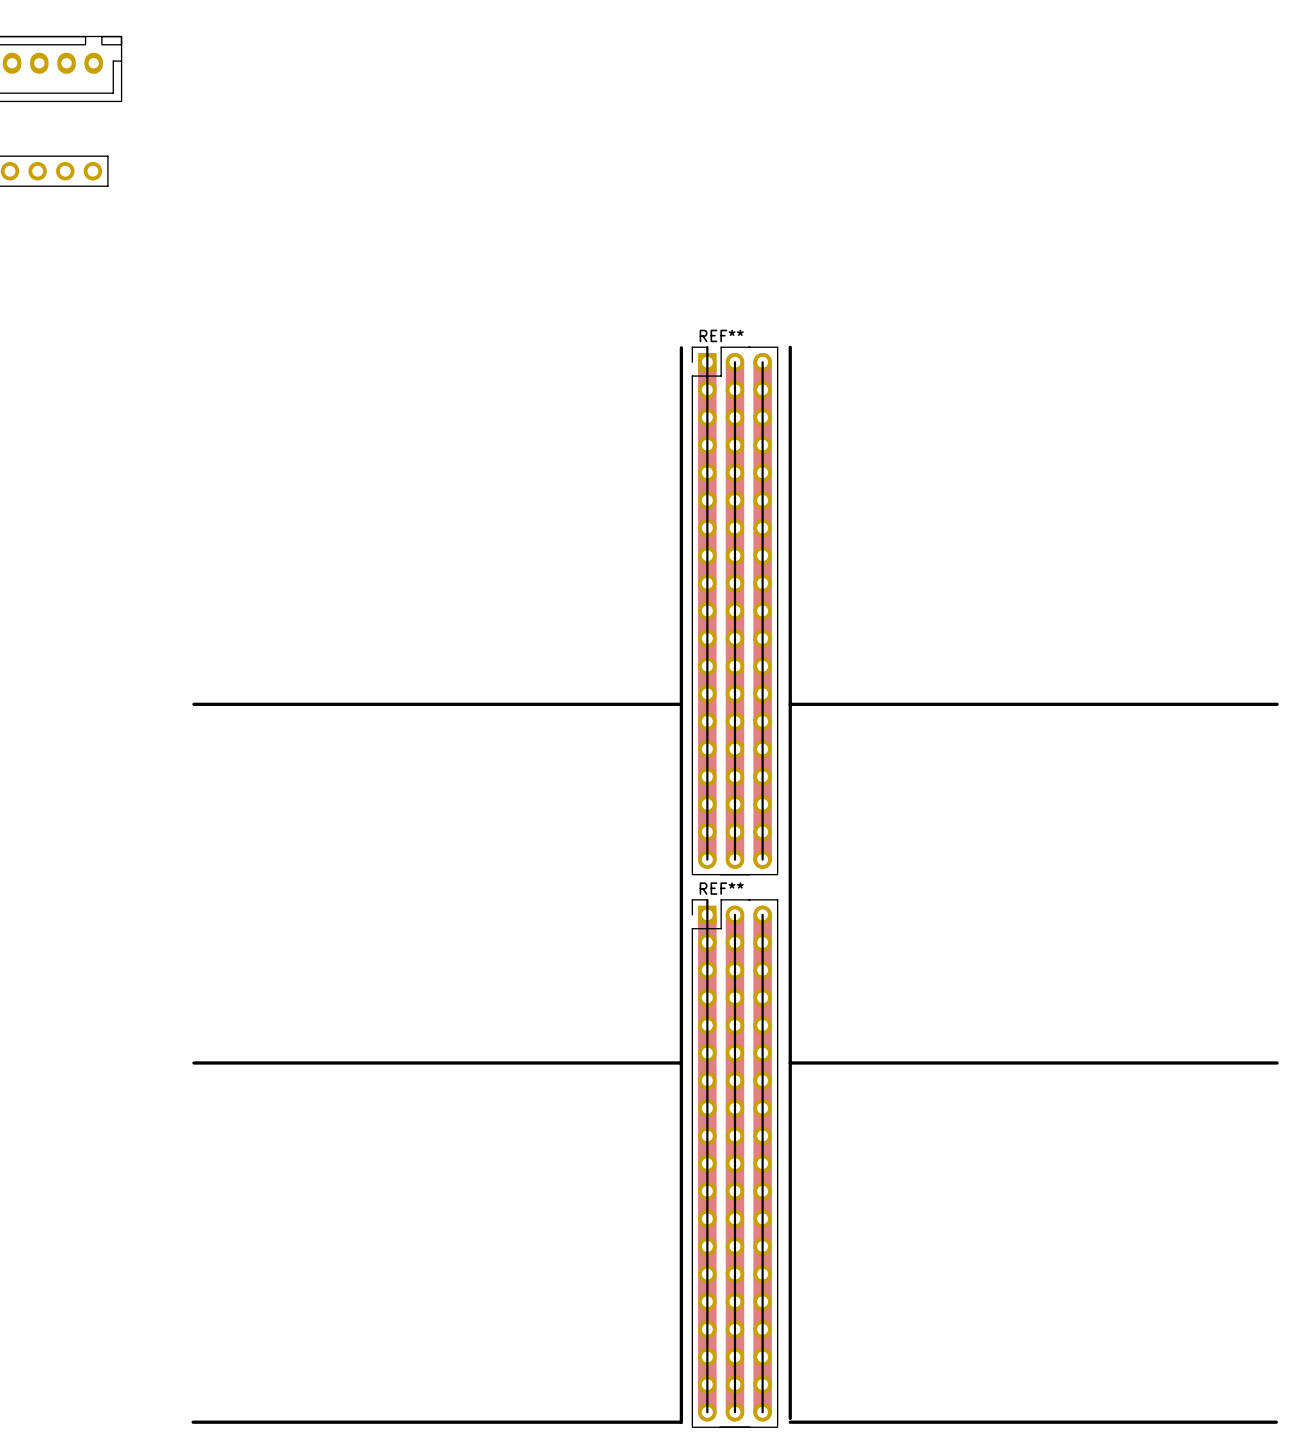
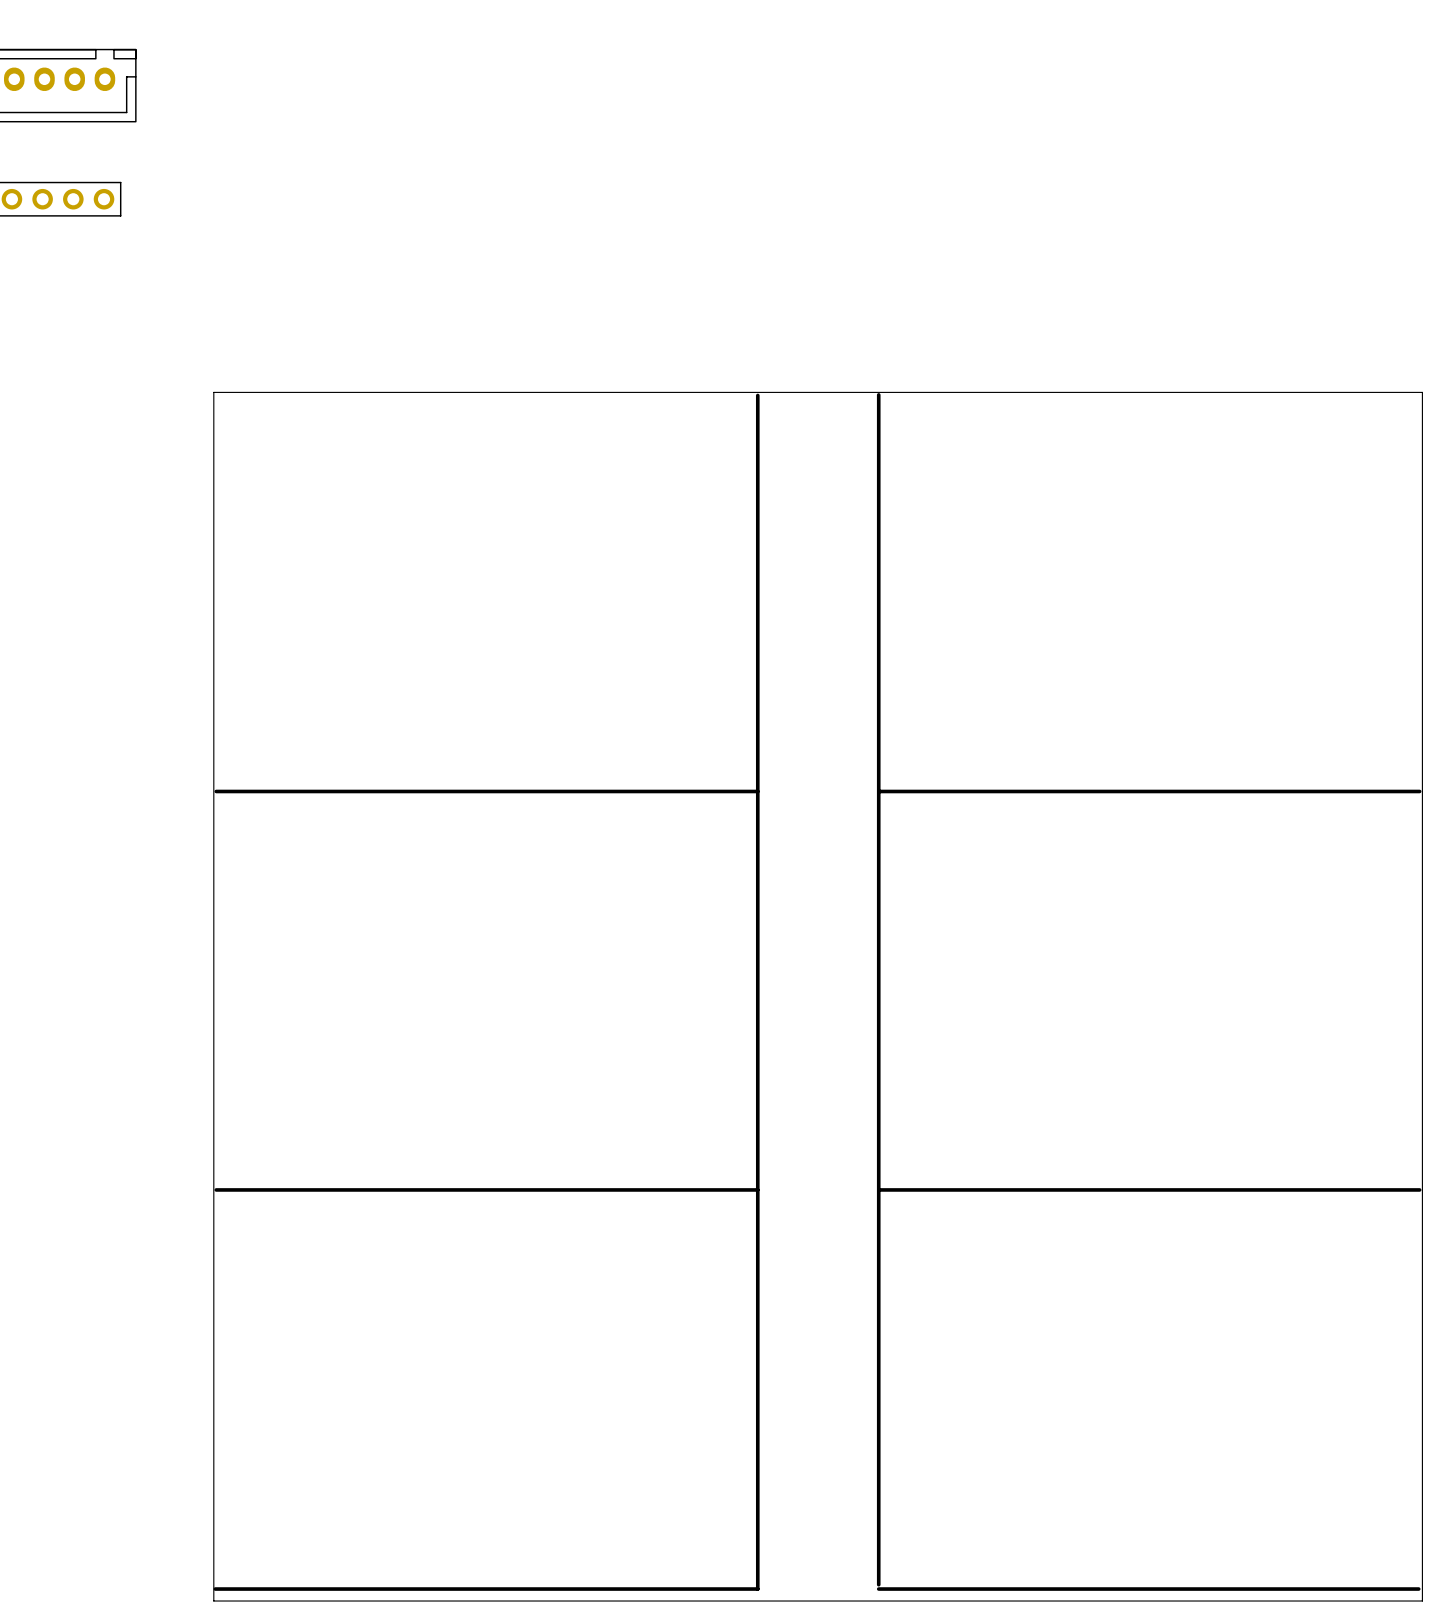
board edge: none -> (213, 392) (1422, 392) (1422, 1601) (213, 1601) (213, 392)
REF**: (734, 610) -> none
REF**: (734, 1163) -> none

